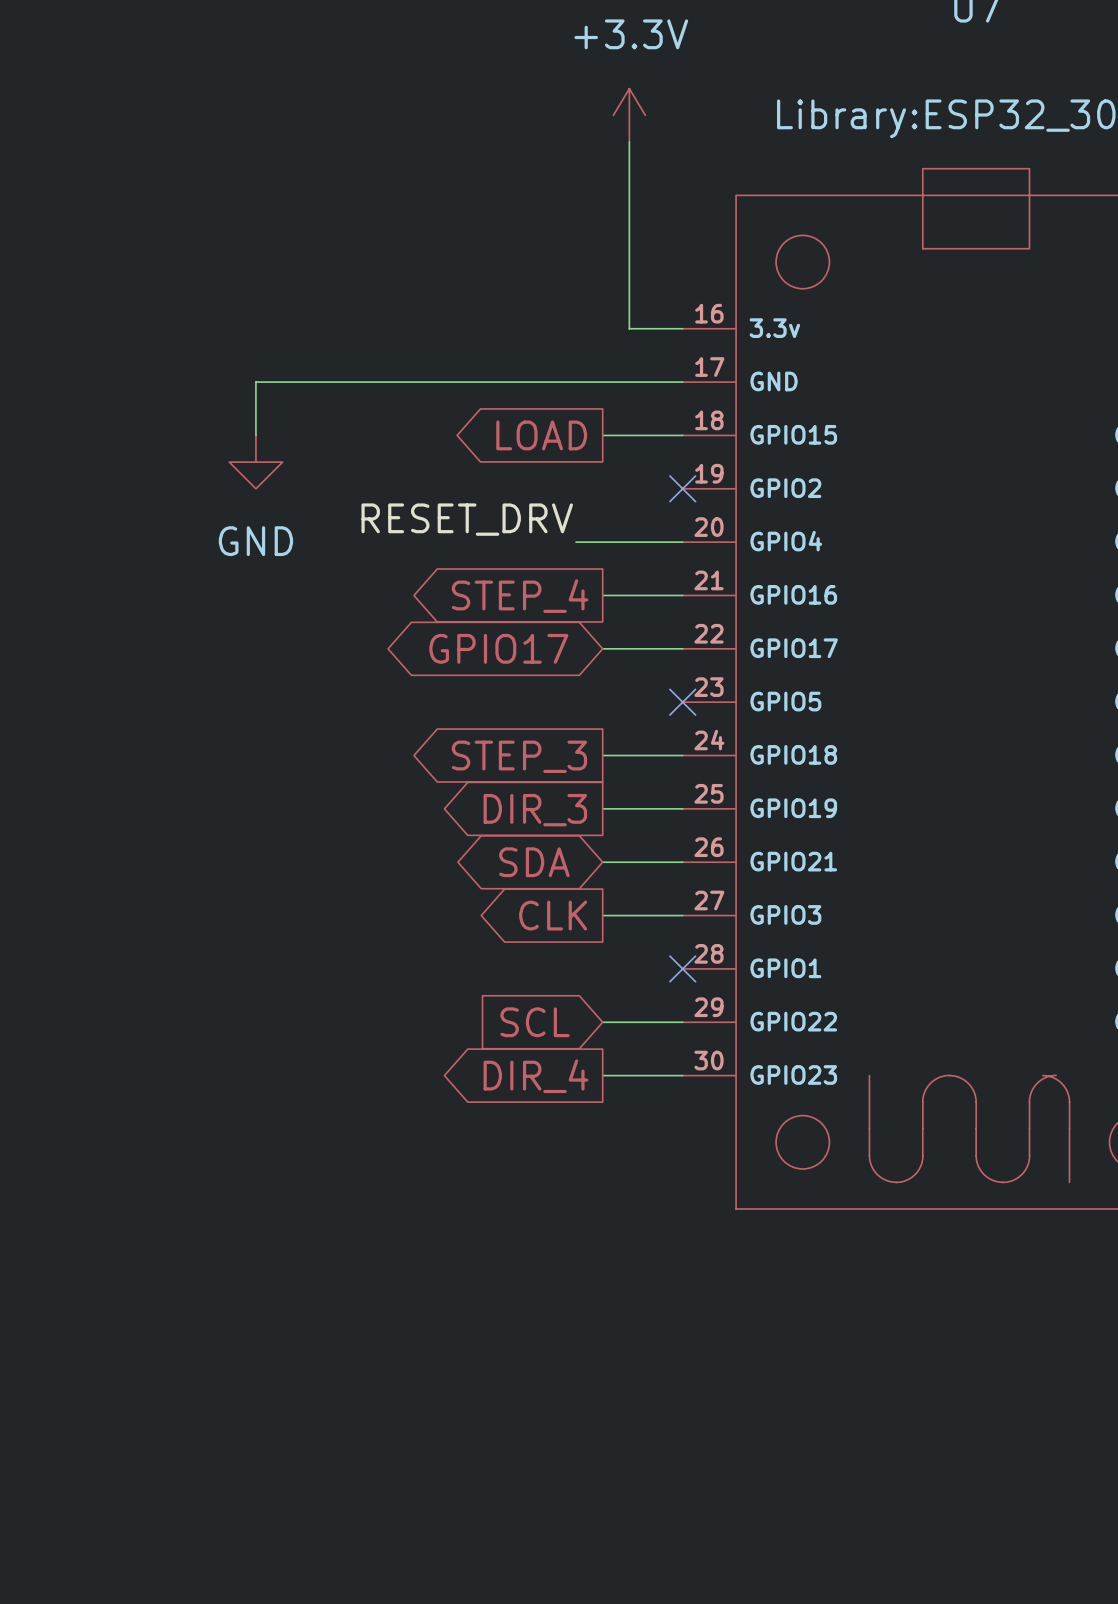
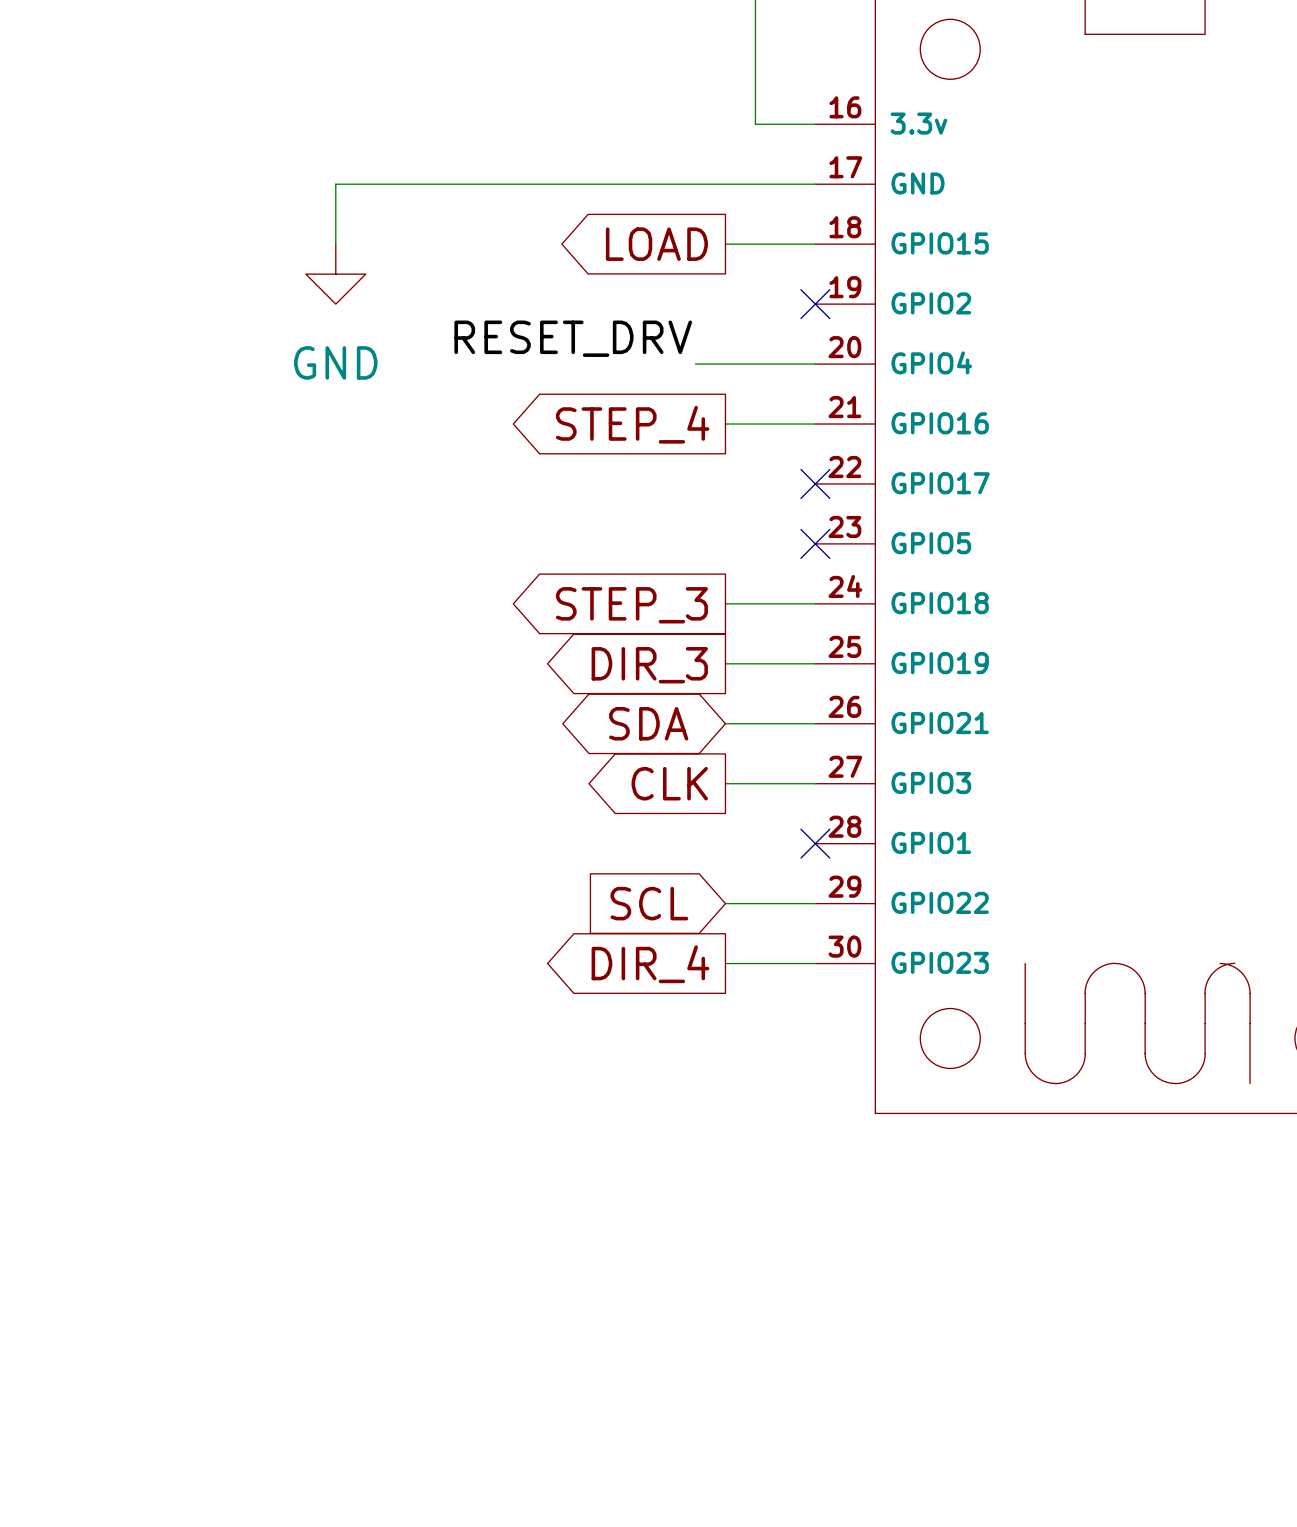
global label: GPIO17 (498, 648) -> none
wire: (602, 648) (682, 648) -> none
no-connect mark: none -> (815, 483)

